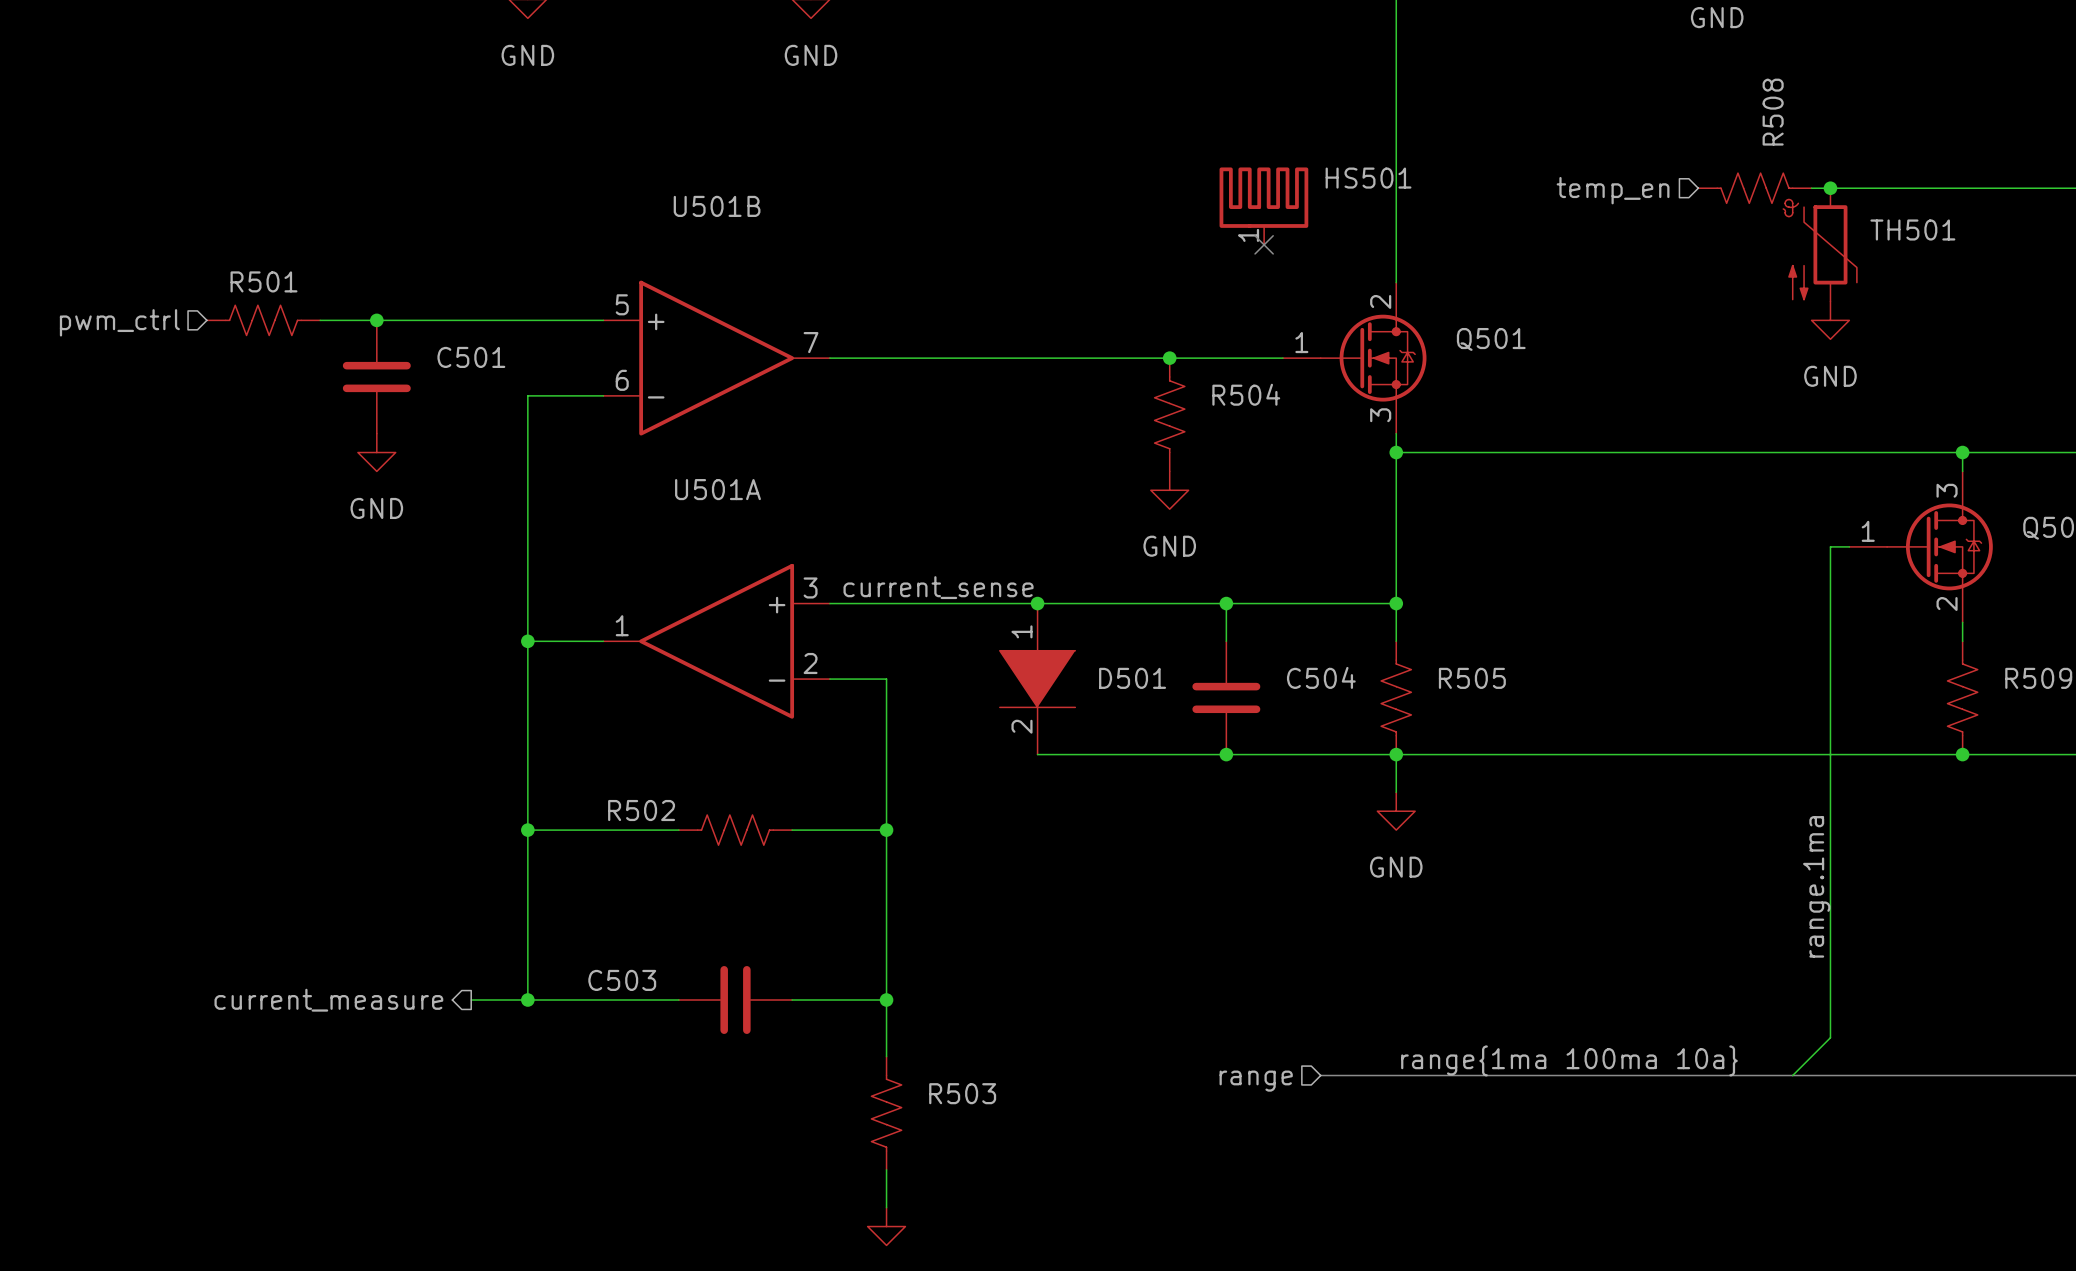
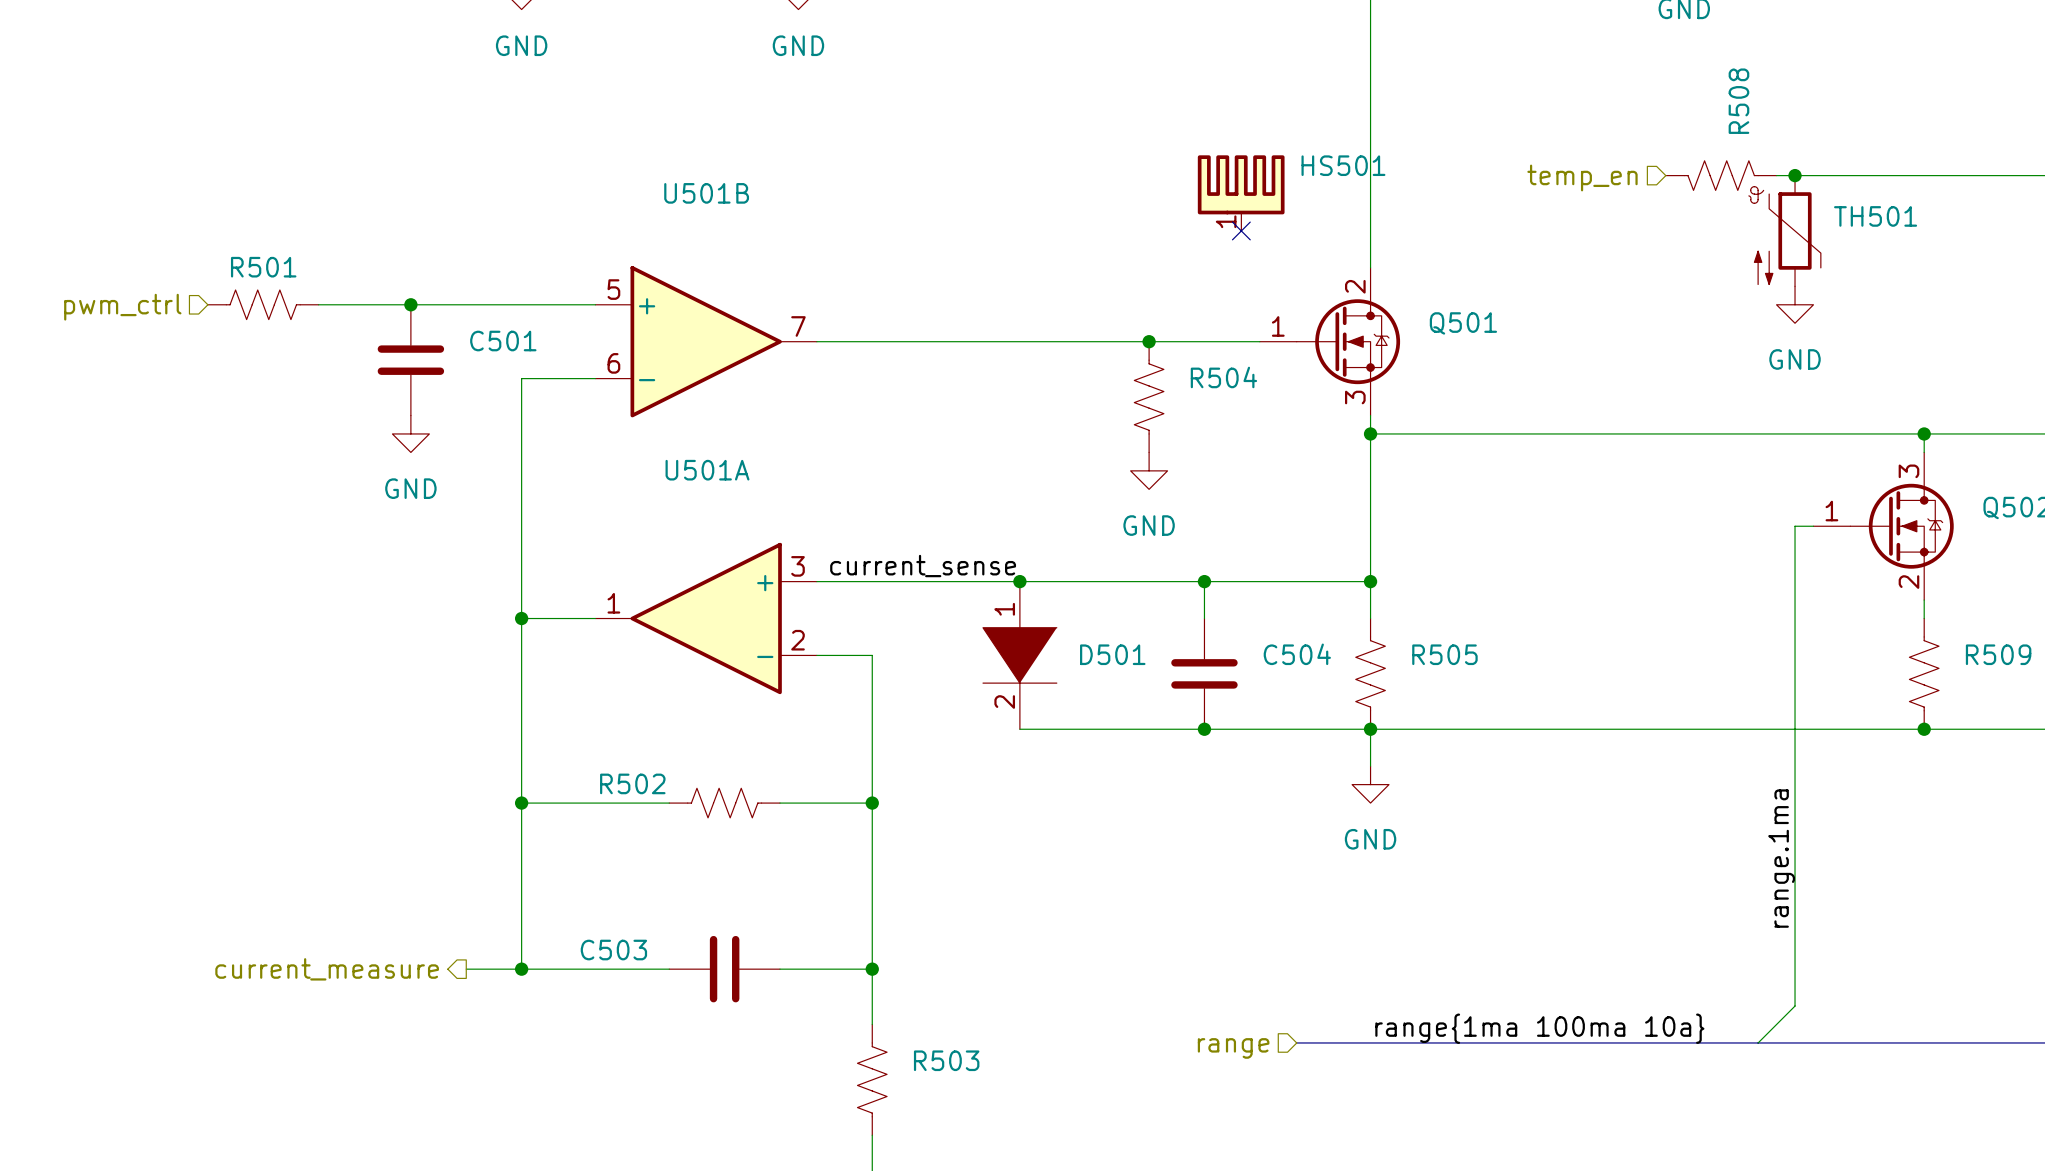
junction position: (376, 320) -> (410, 304)
C501 position: (376, 377) -> (410, 360)
power symbol position: GND (376, 452) -> GND (410, 433)

